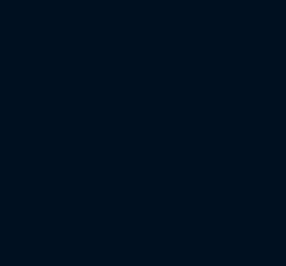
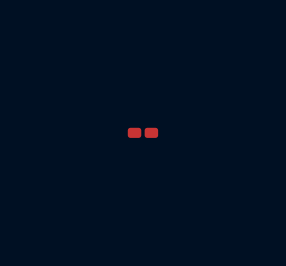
part: none -> (142, 132)

